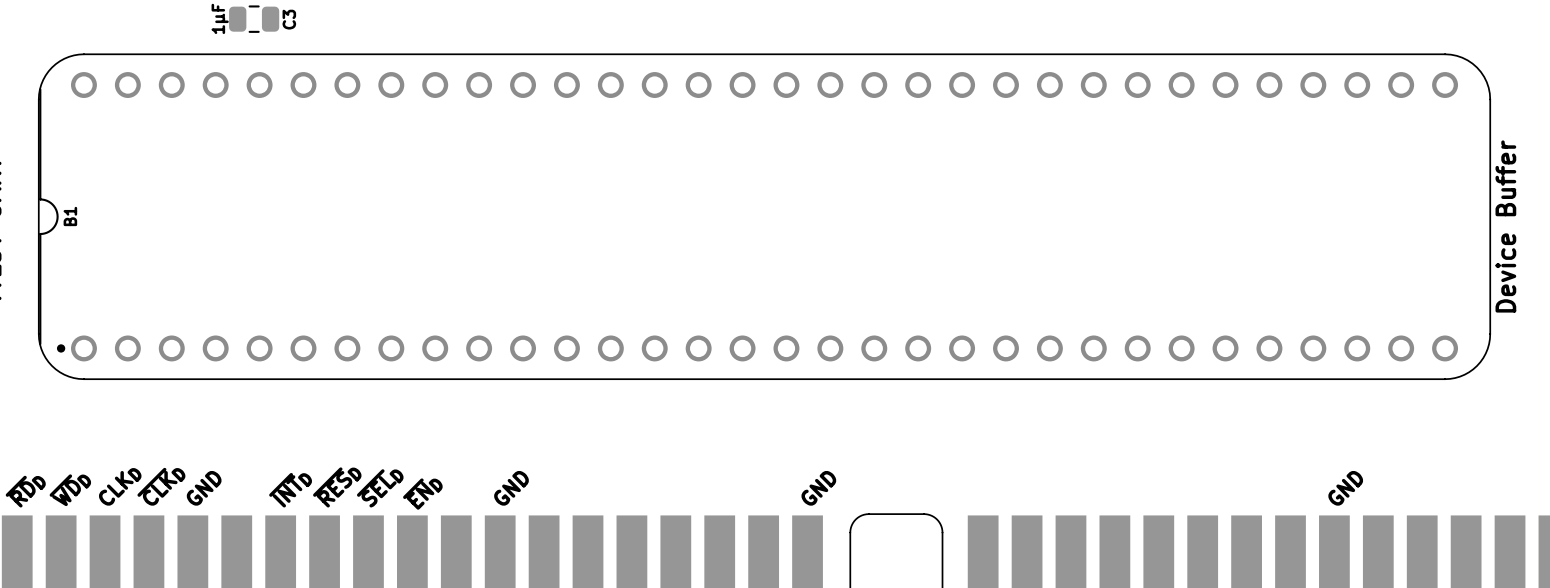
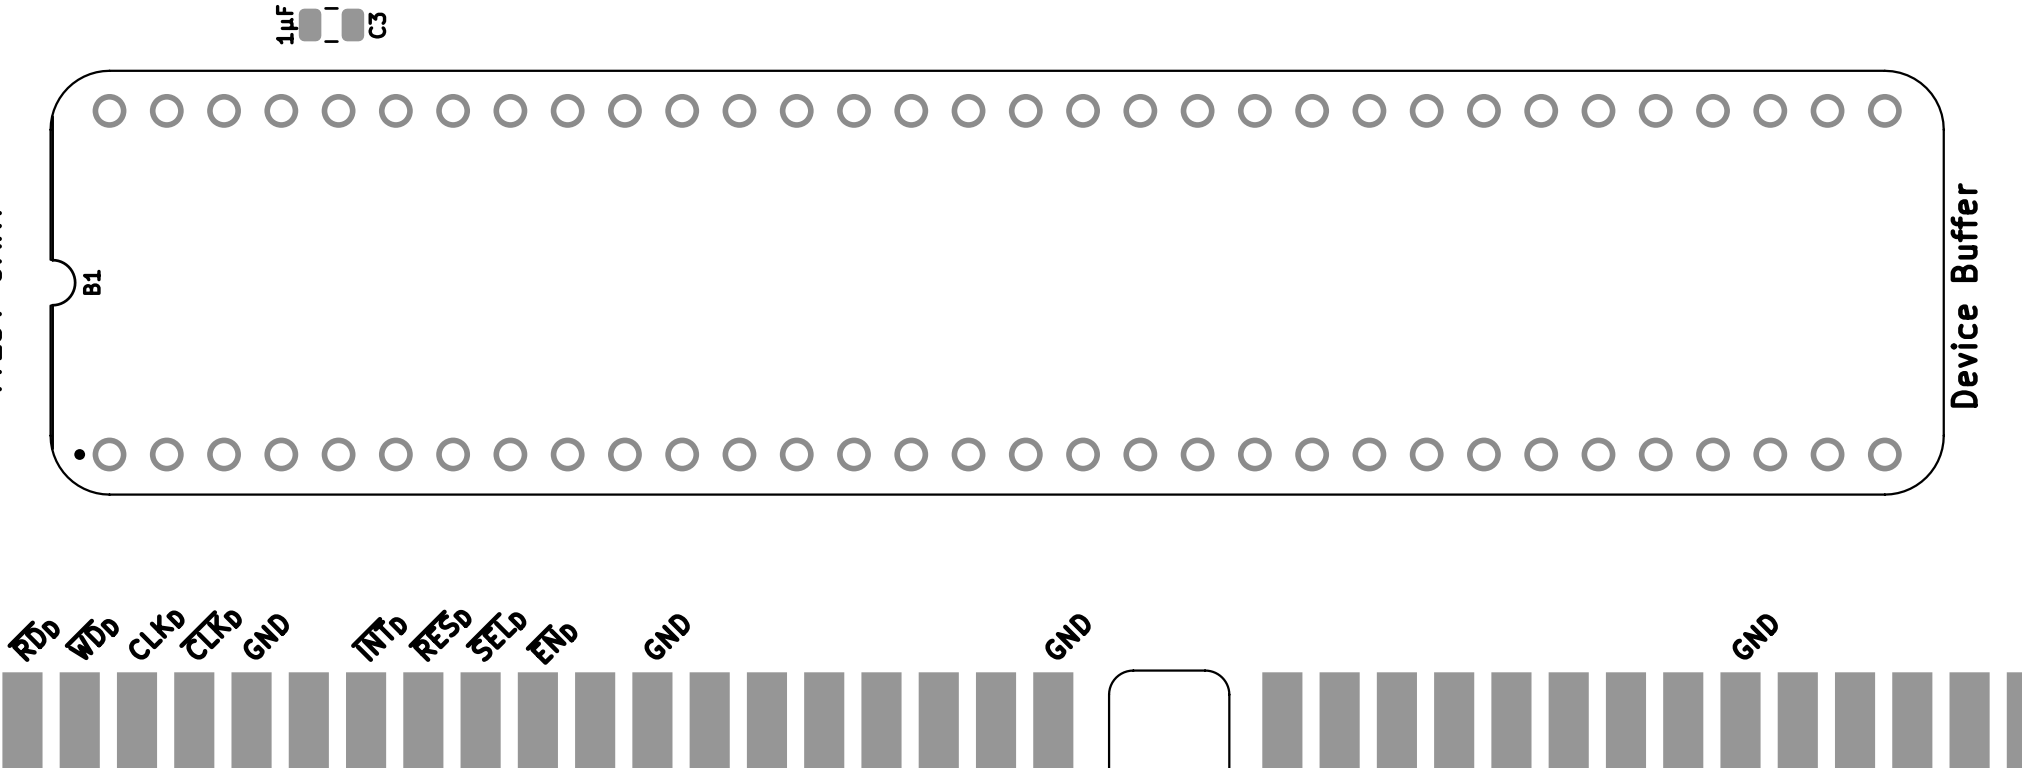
B1 footprint: [37, 53, 1492, 381] -> [49, 69, 1945, 496]

